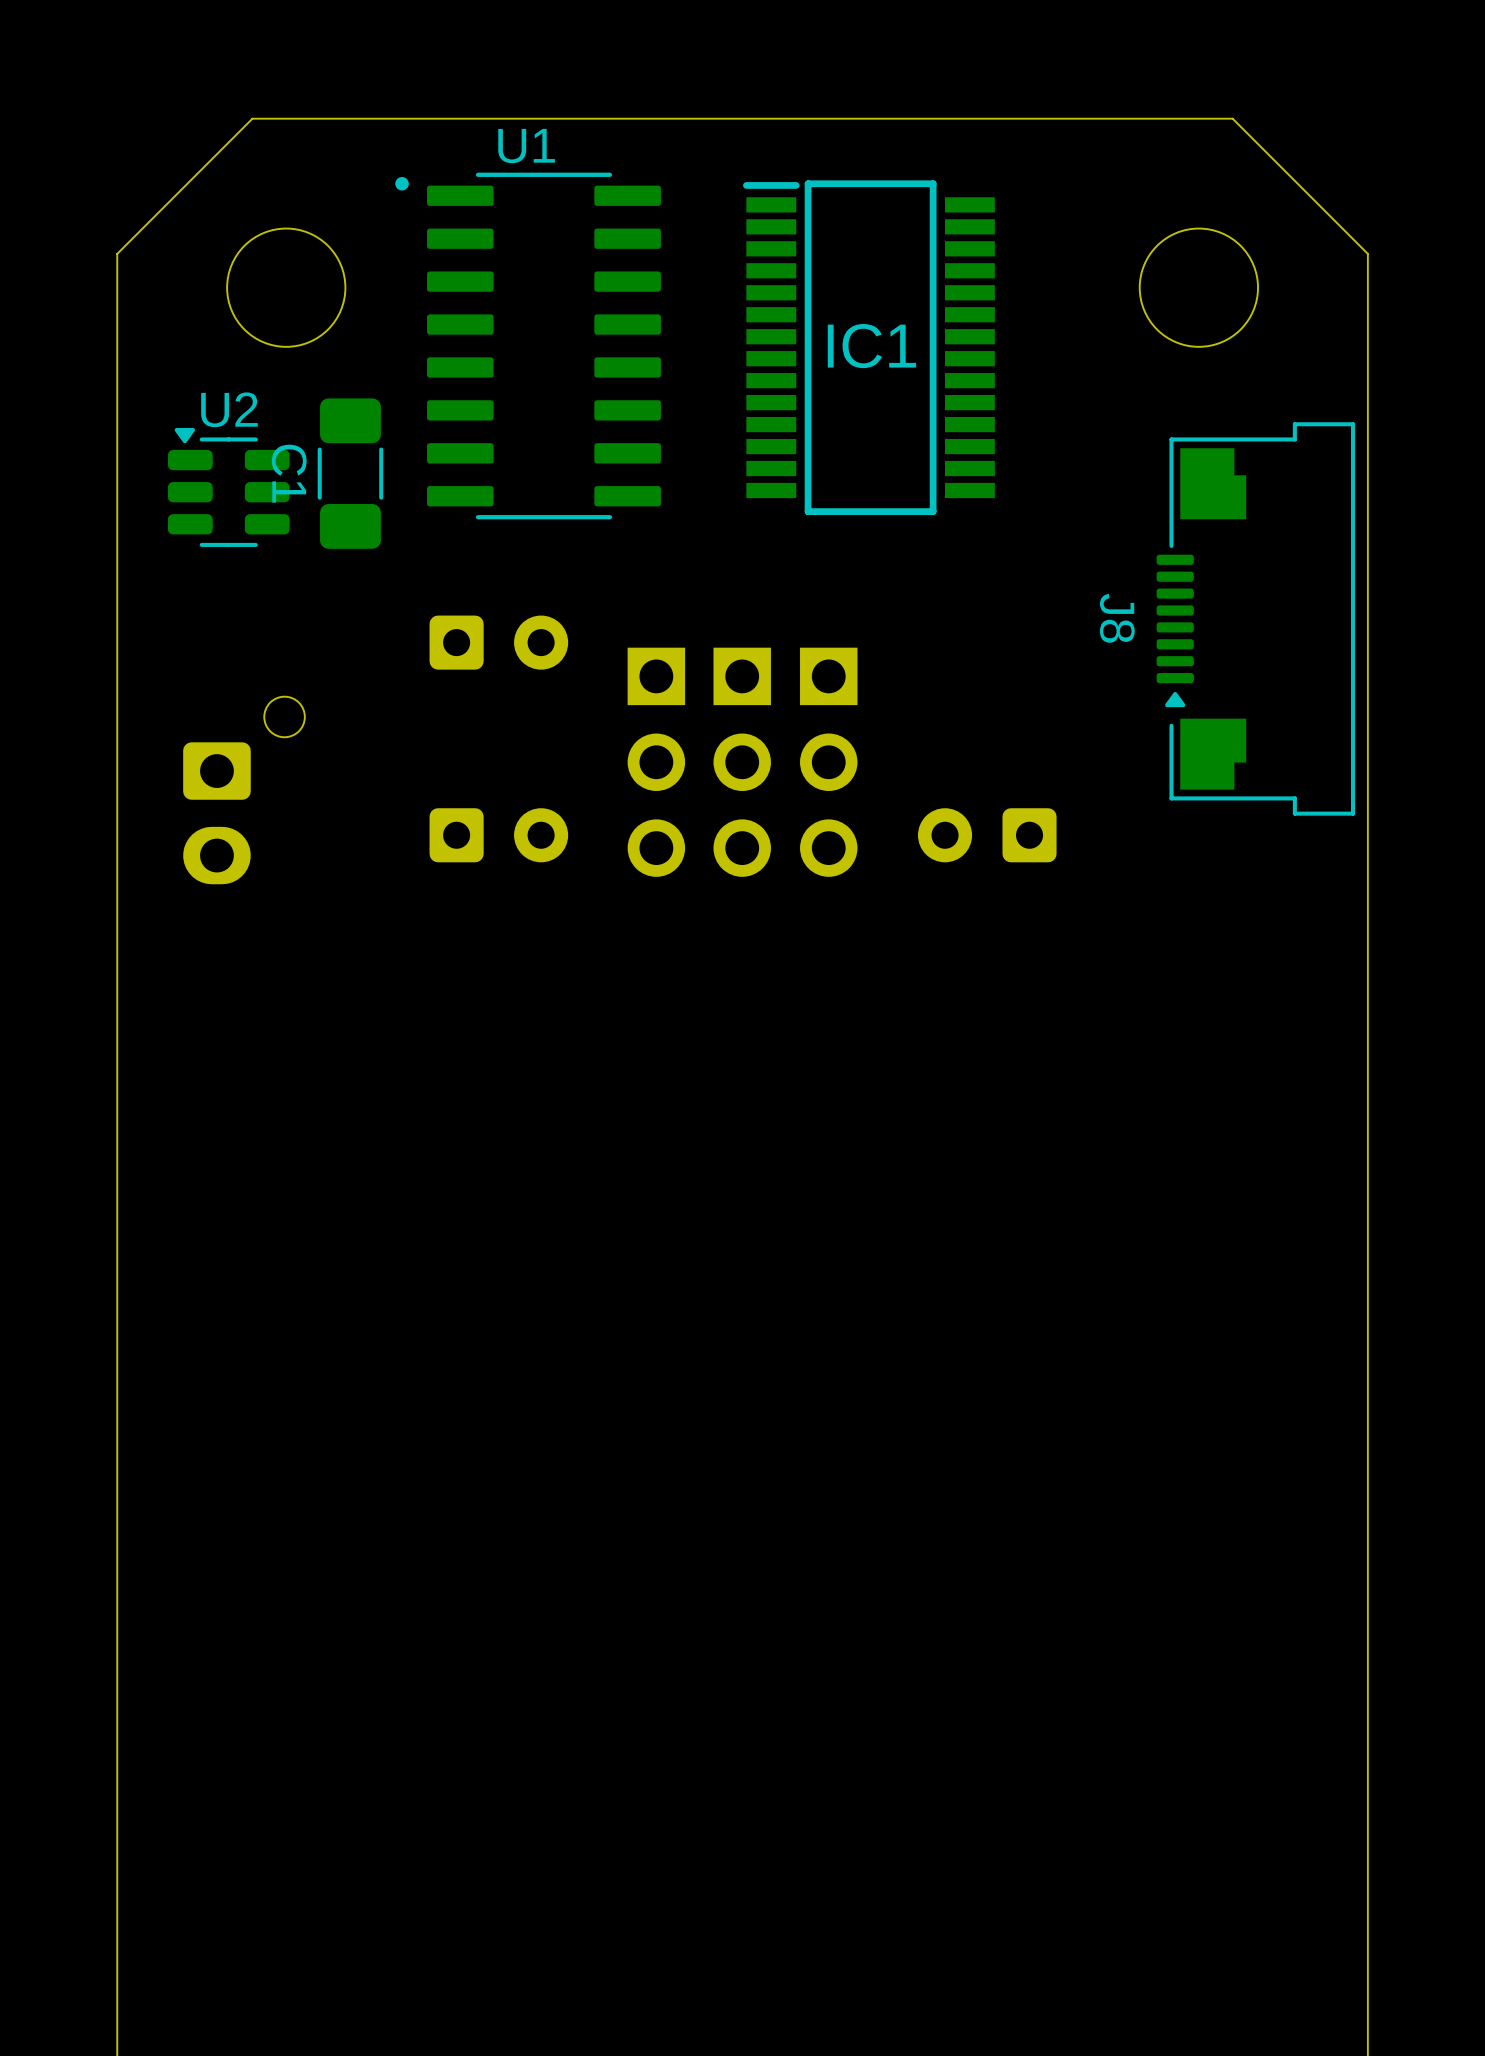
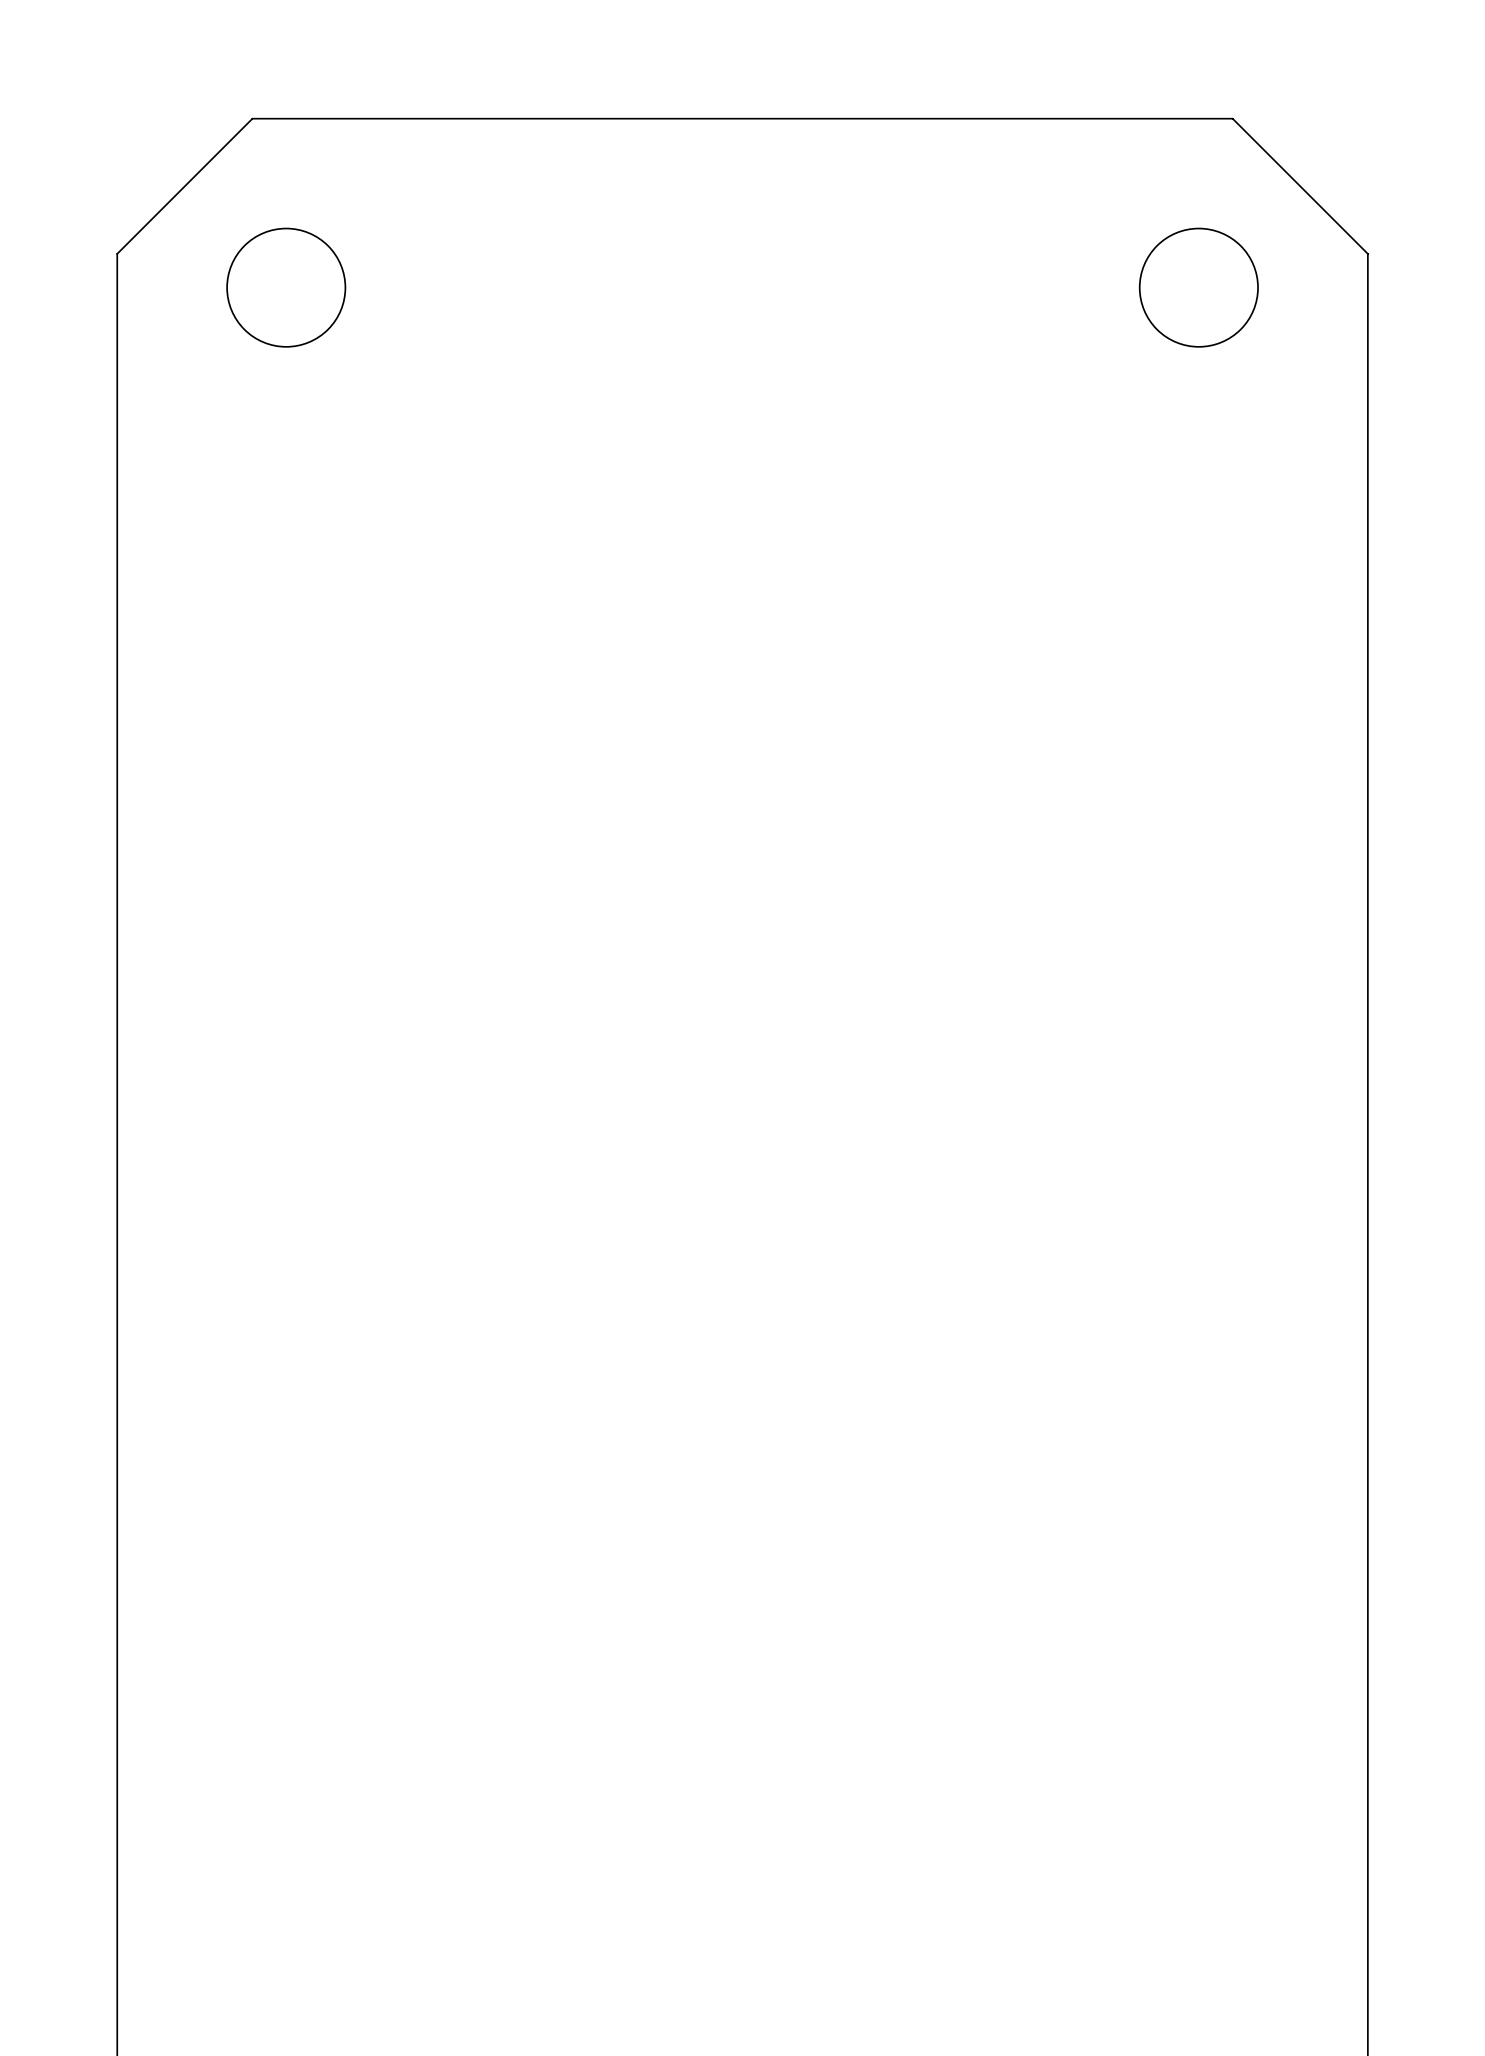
U1: (528, 346) -> none
IC1: (868, 347) -> none
C1: (350, 473) -> none
U2: (228, 487) -> none
J8: (1255, 618) -> none
part: (498, 642) -> none
part: (656, 762) -> none
part: (742, 762) -> none
part: (828, 762) -> none
part: (244, 790) -> none
part: (498, 835) -> none
part: (987, 835) -> none

